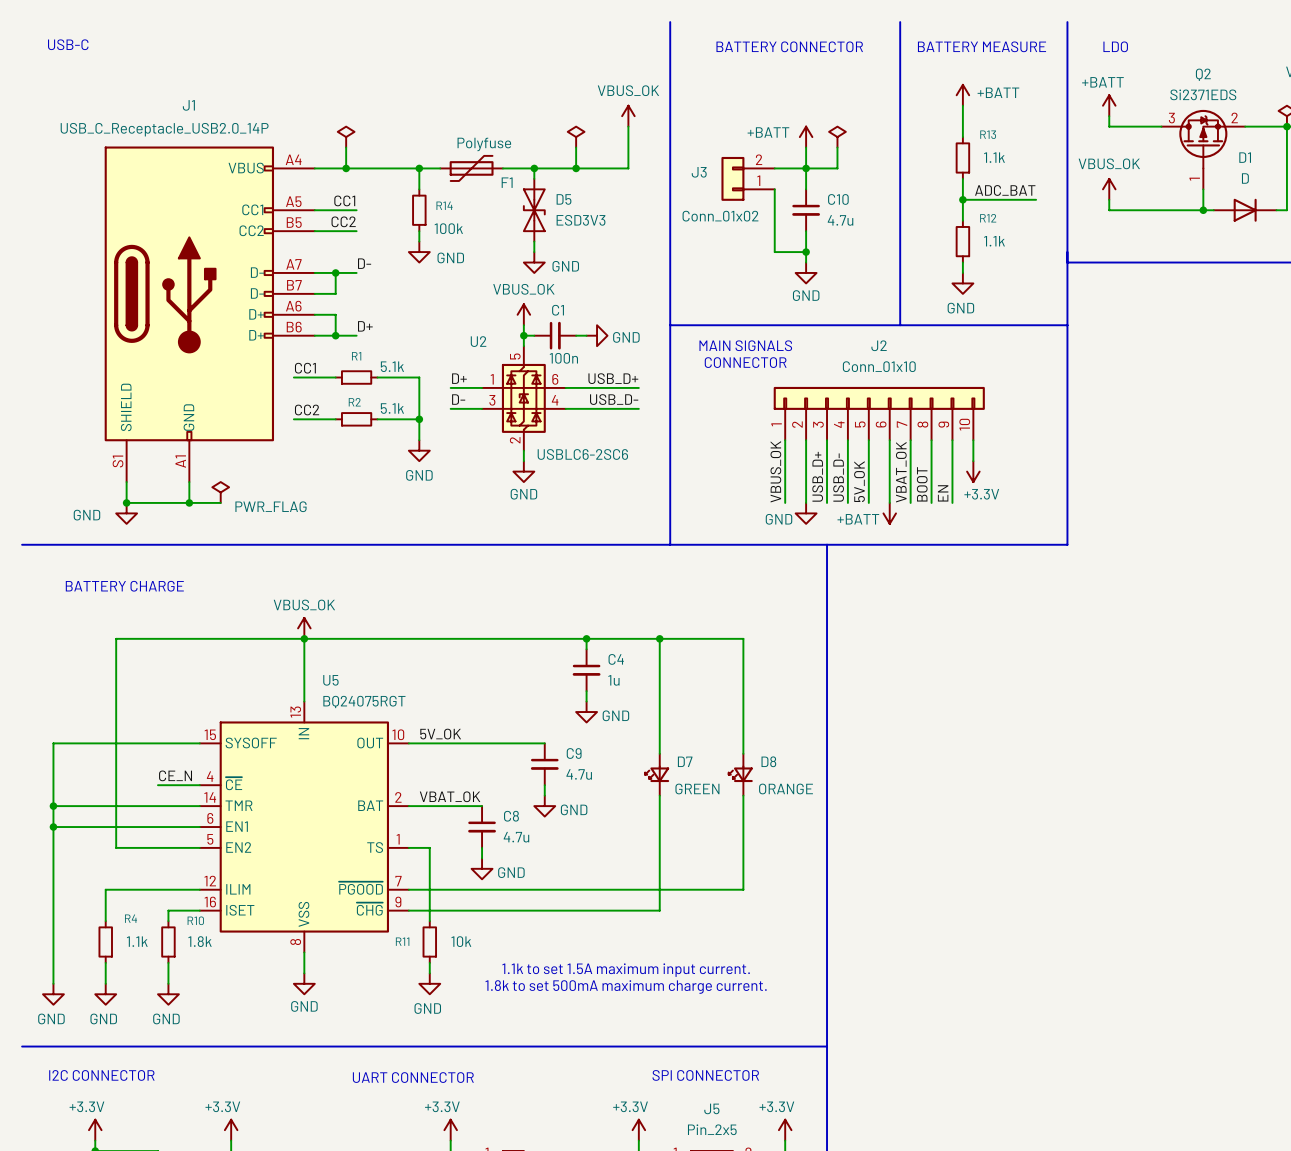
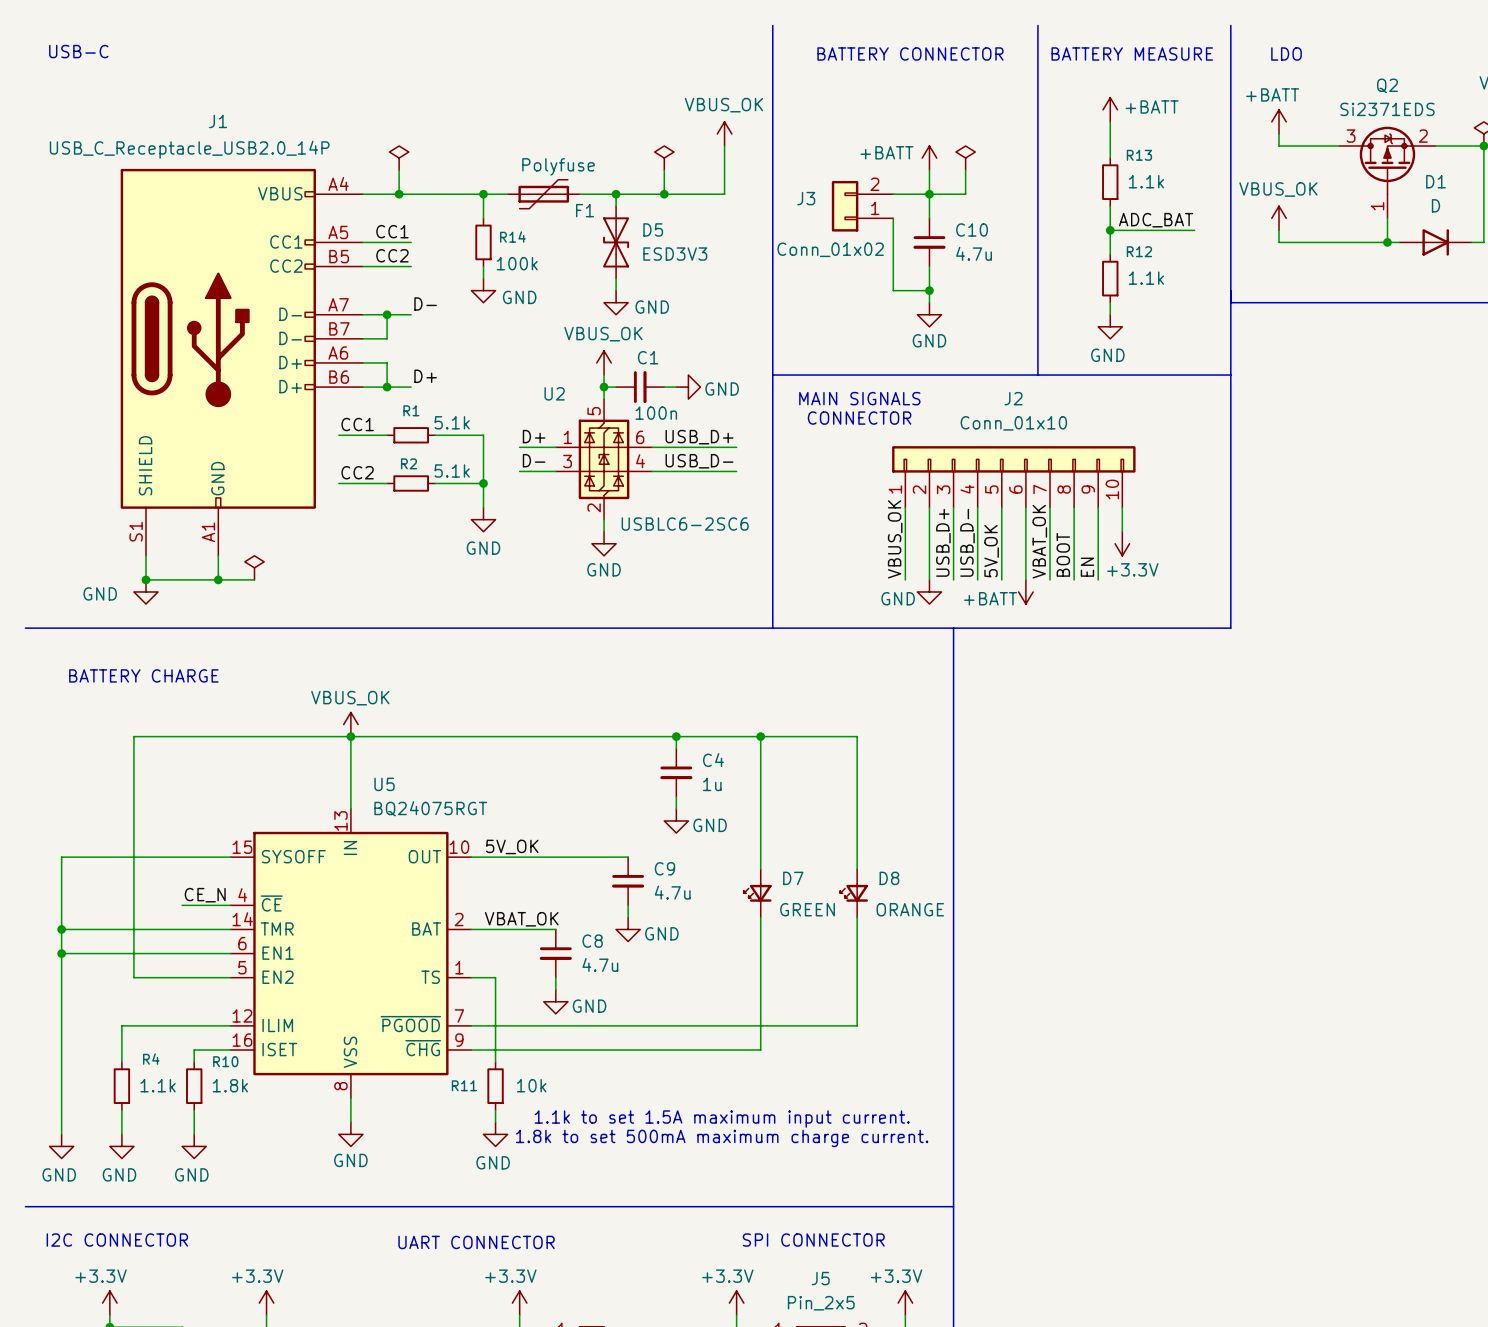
power symbol text: PWR_FLAG (271, 506) -> none

